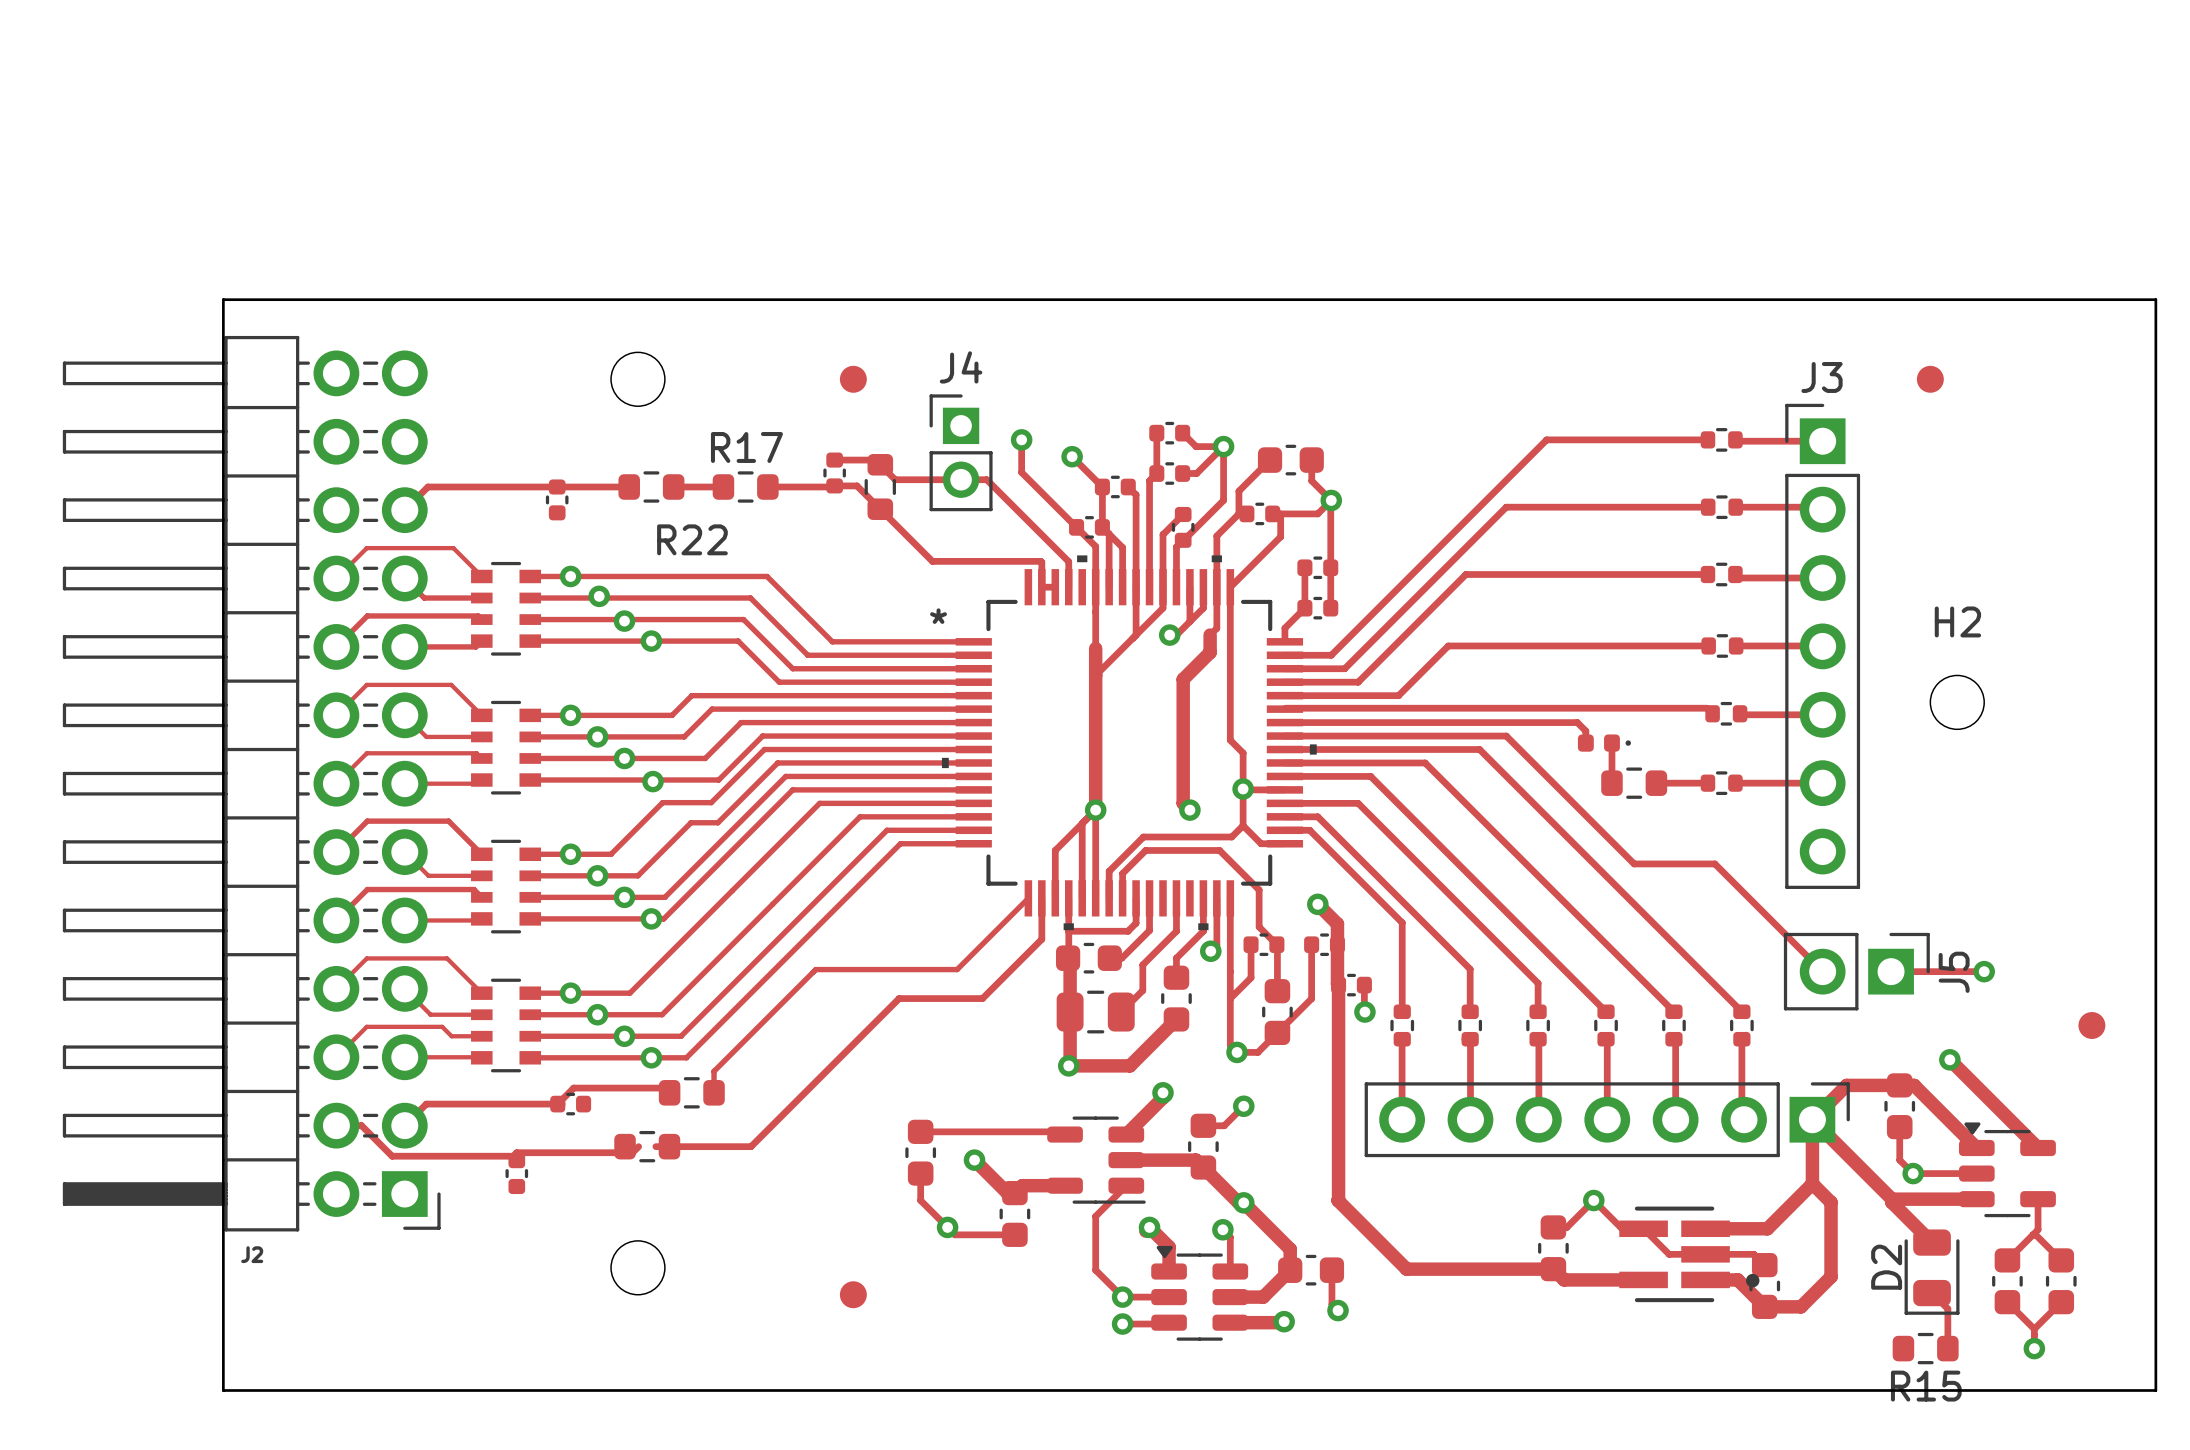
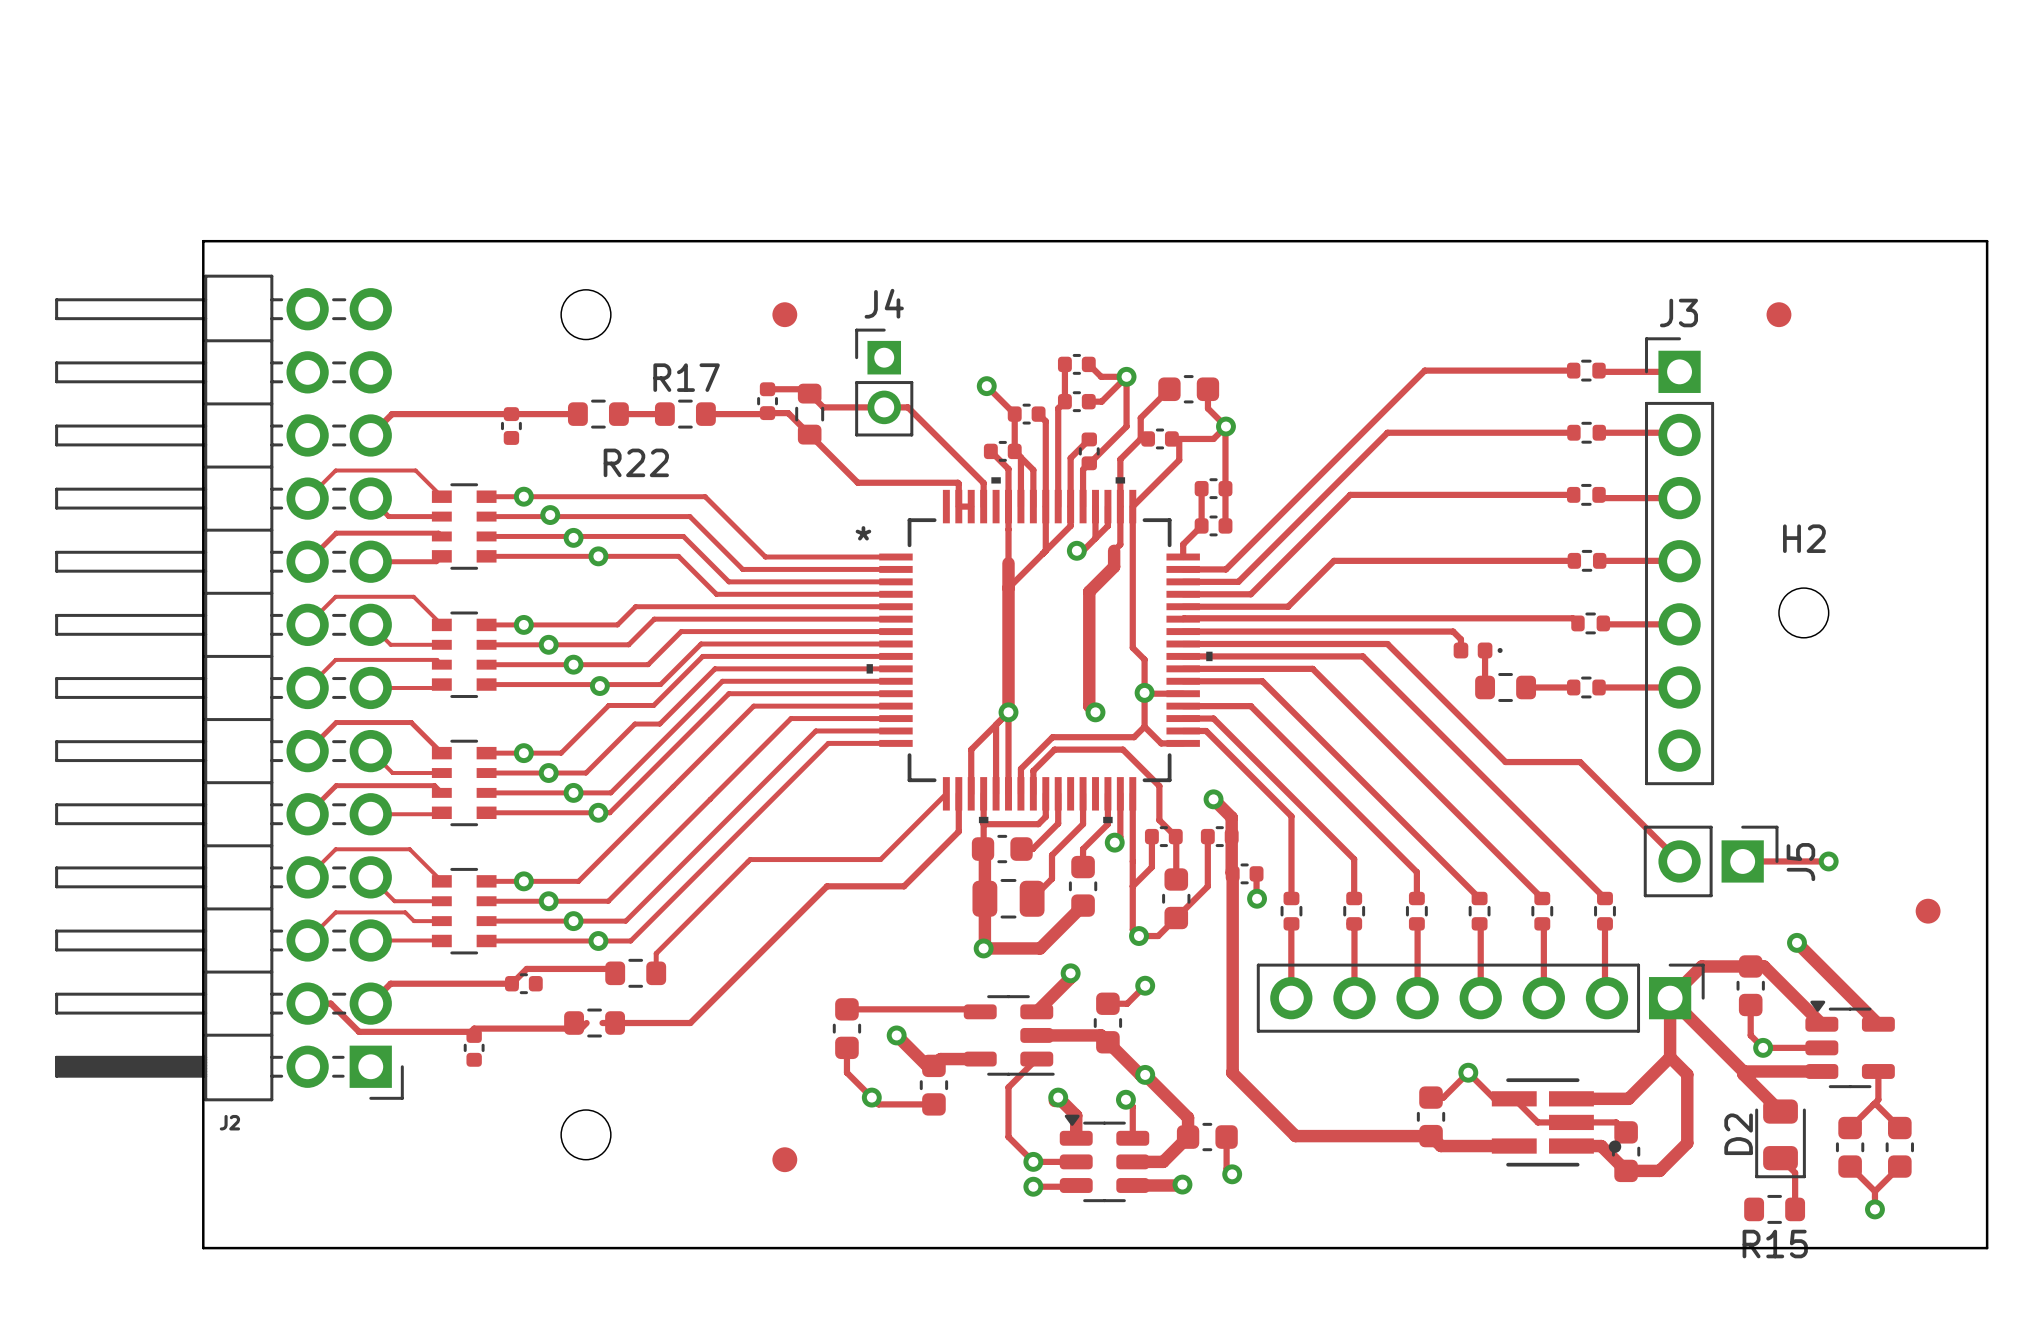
track: (1021, 439) (1021, 472) (1076, 527) -> none
via: (1021, 439) -> none

